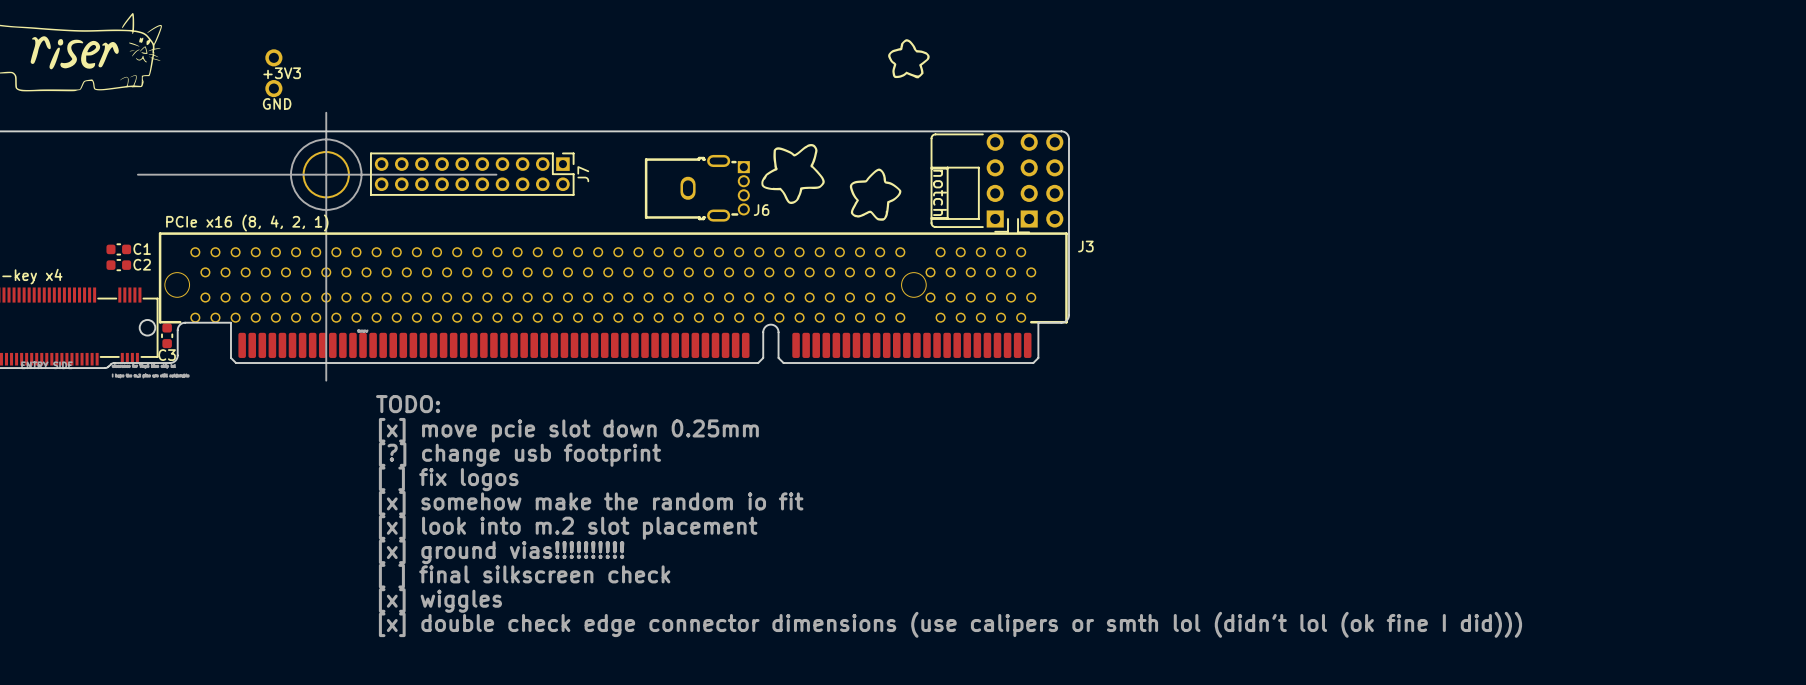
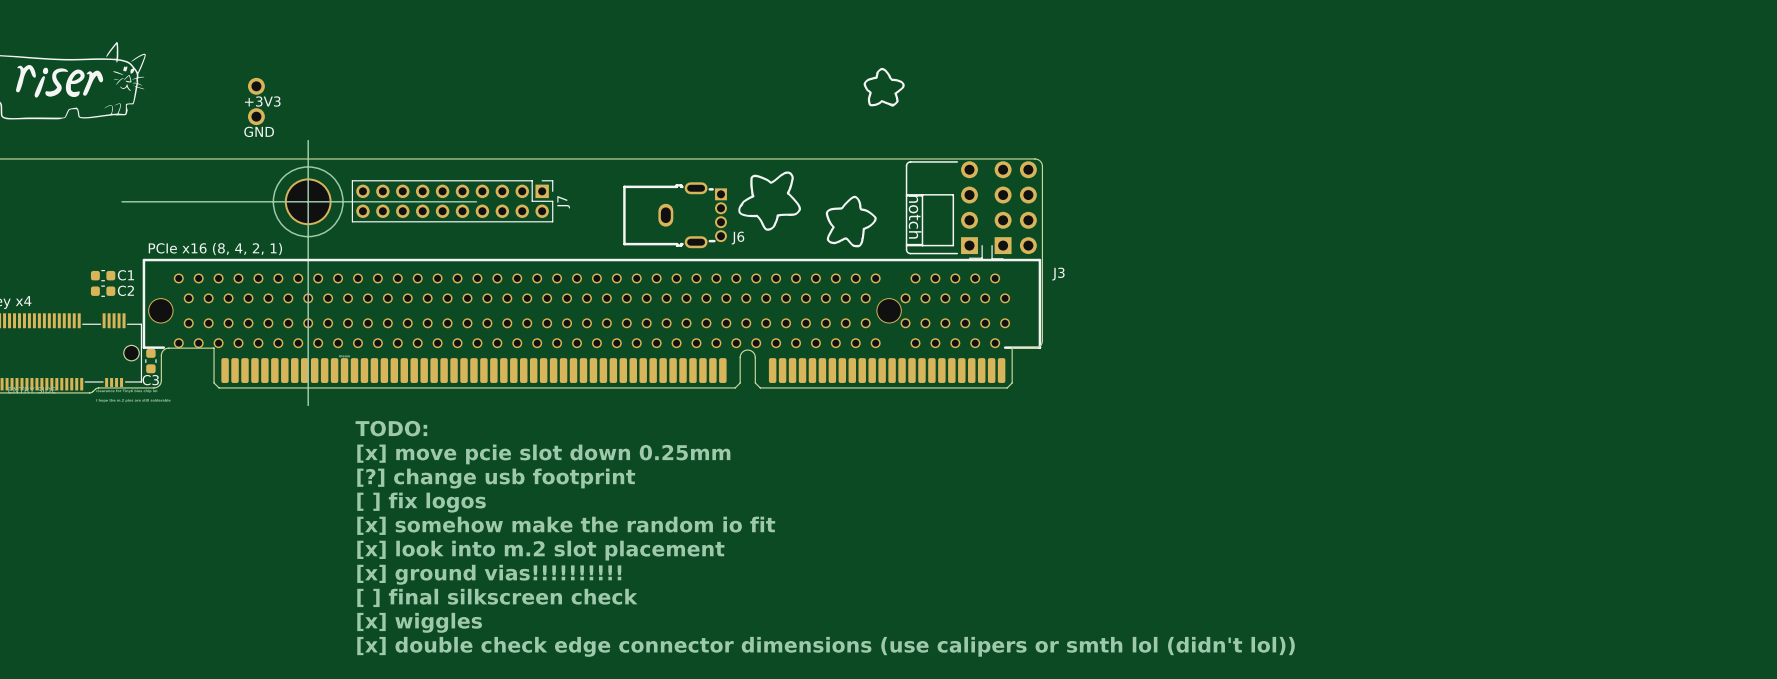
text: [x] double check edge connector dimensions (use calipers or smth lol (didn't lol (ok fine I did))) (950, 624) -> [x] double check edge connector dimensions (use calipers or smth lol (didn't lol)) (826, 646)

